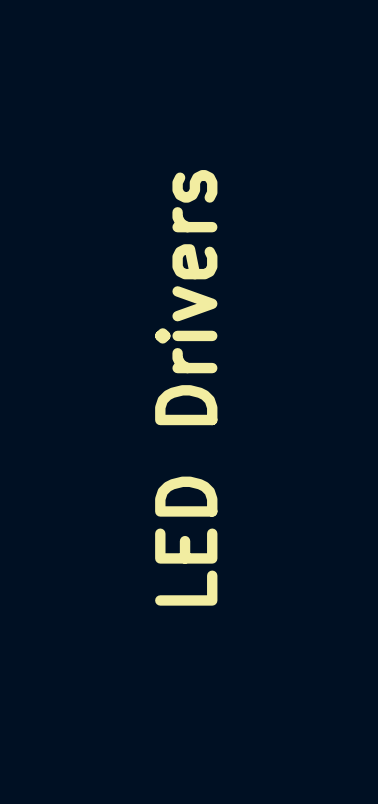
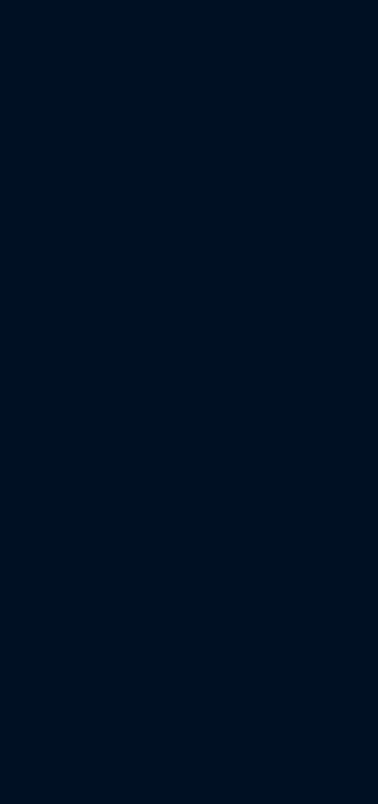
text: LED Drivers (186, 387) -> none

